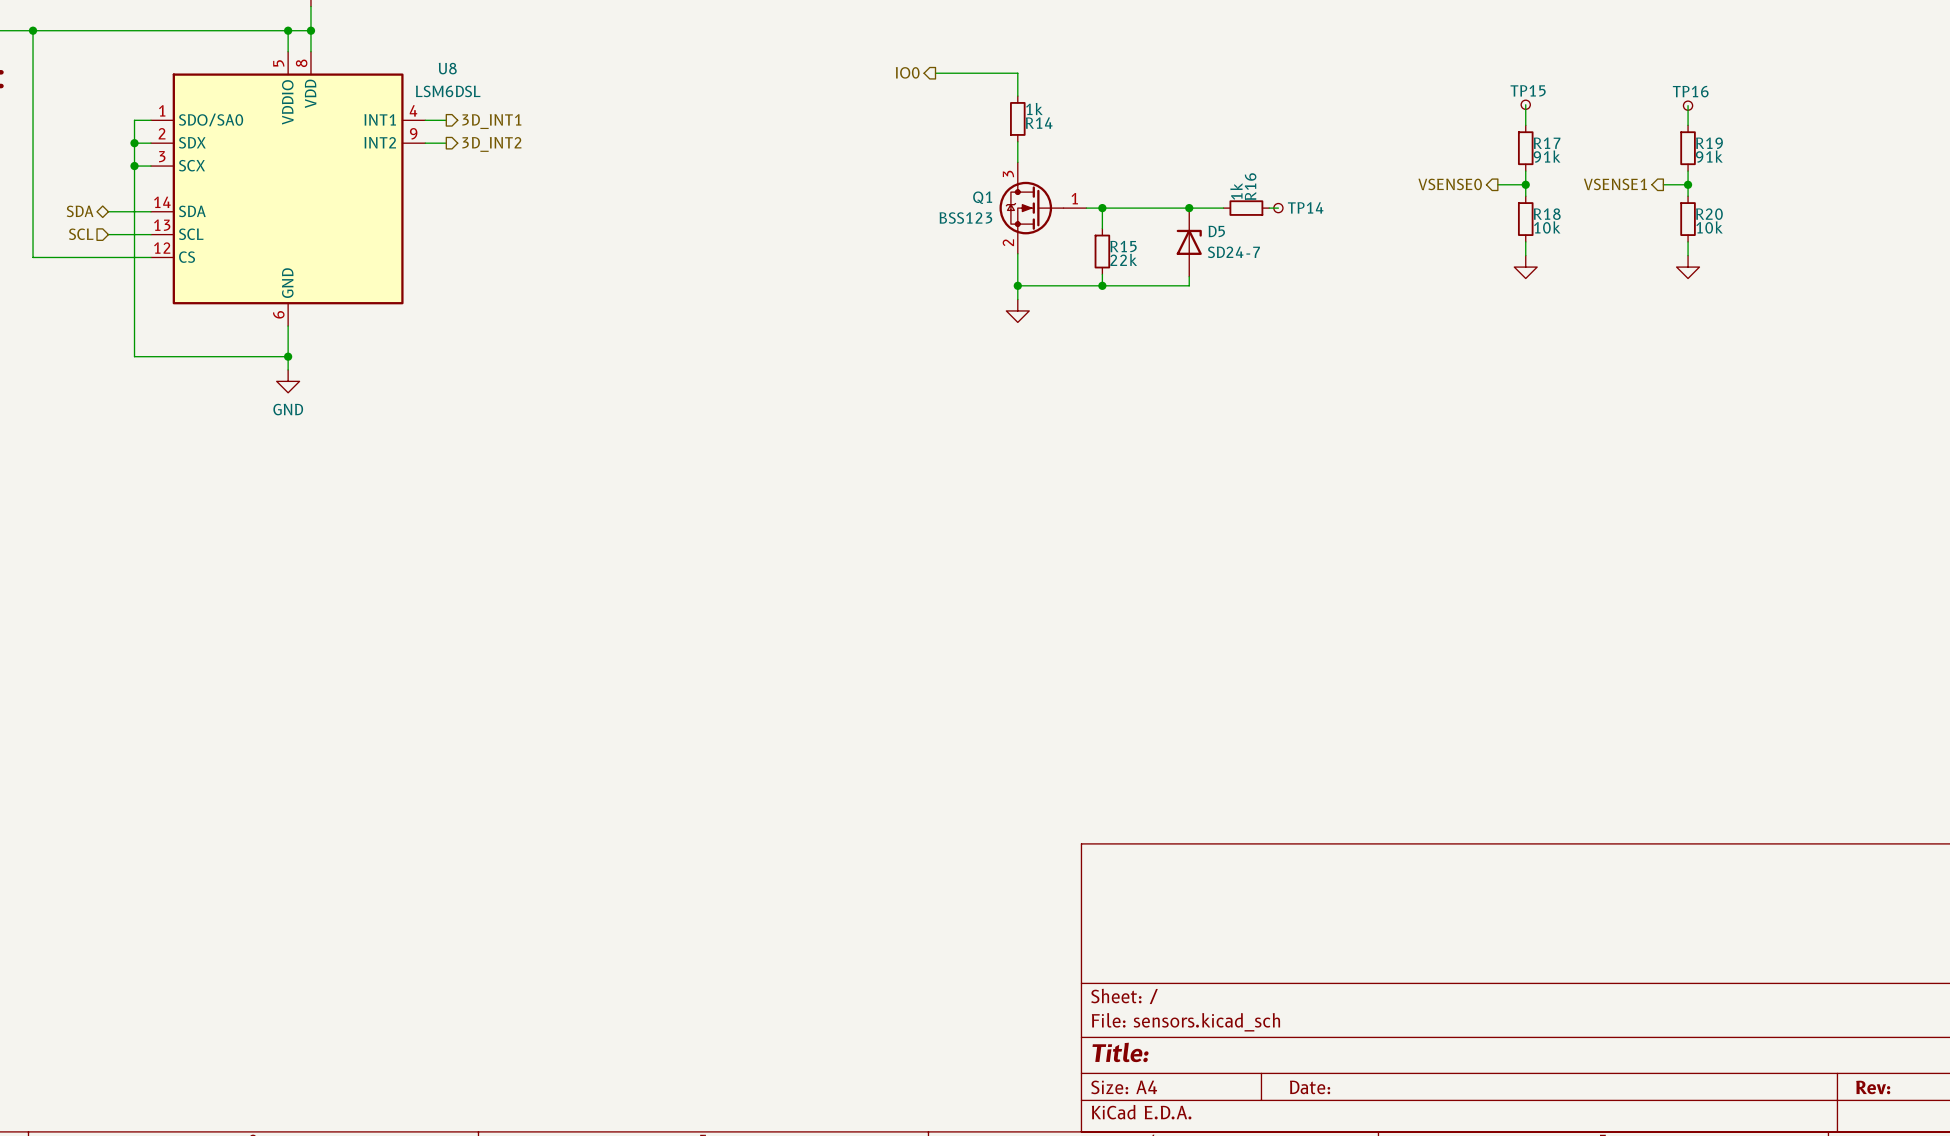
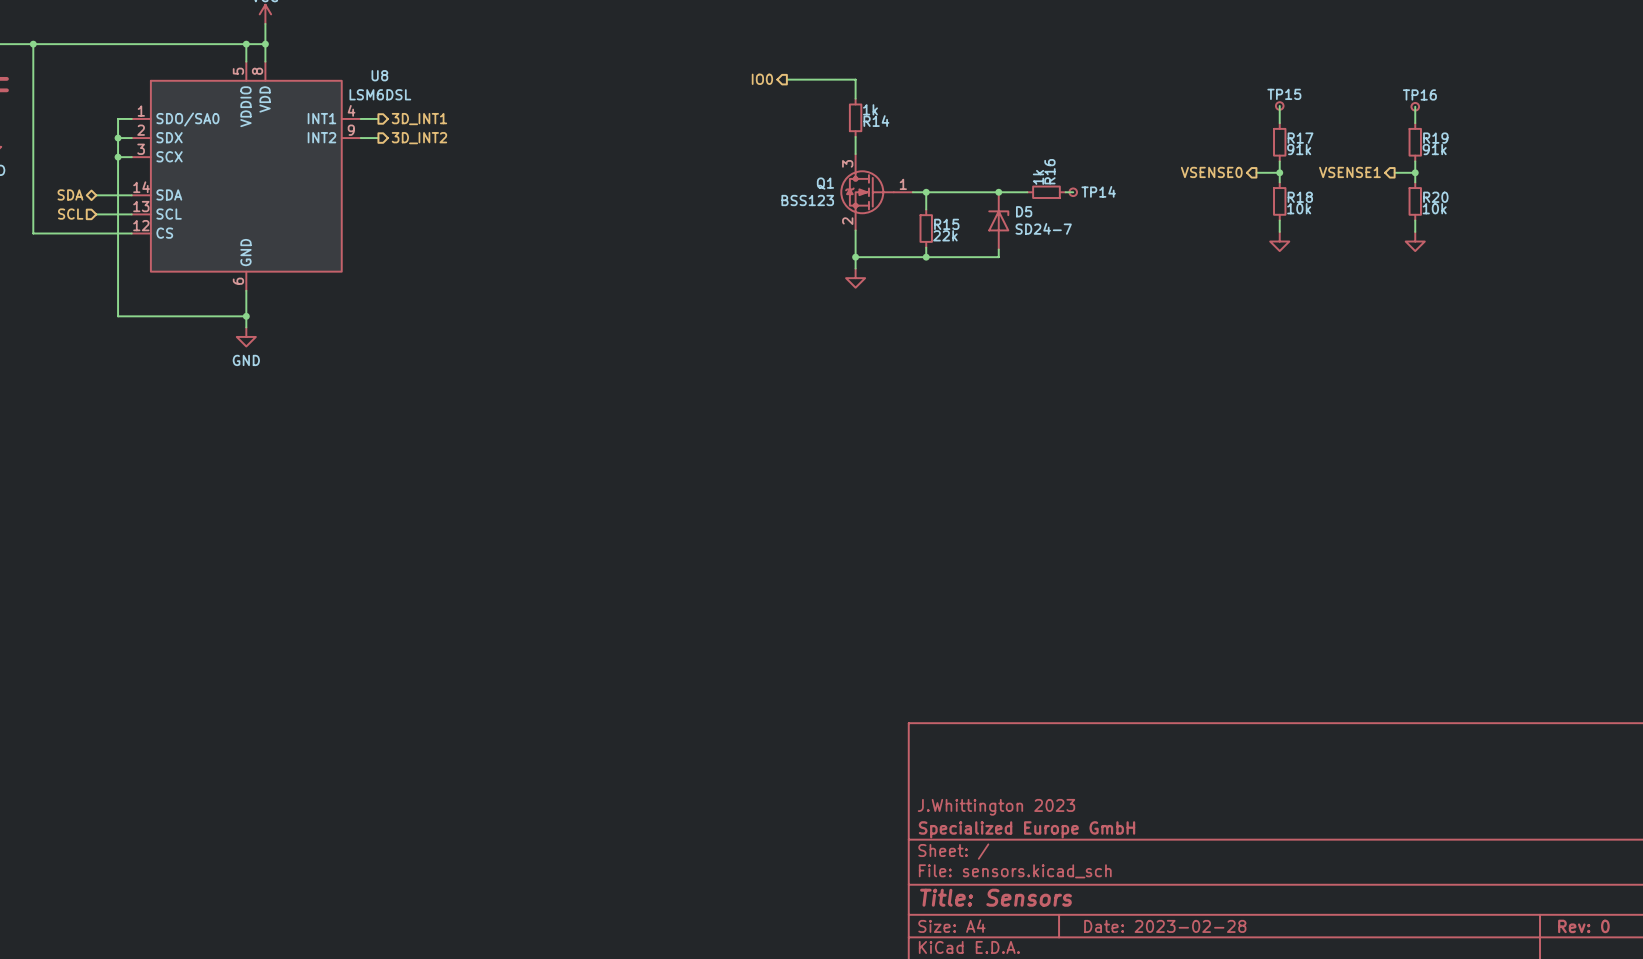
title block: none -> J.Whittington 2023 (996, 807)
title block: none -> Specialized Europe GmbH (1026, 829)
title block: Title: (1120, 1052) -> Title: Sensors (996, 897)
title block: Date: (1310, 1087) -> Date: 2023-02-28 (1165, 926)
title block: Rev: (1873, 1087) -> Rev: 0 (1583, 926)

